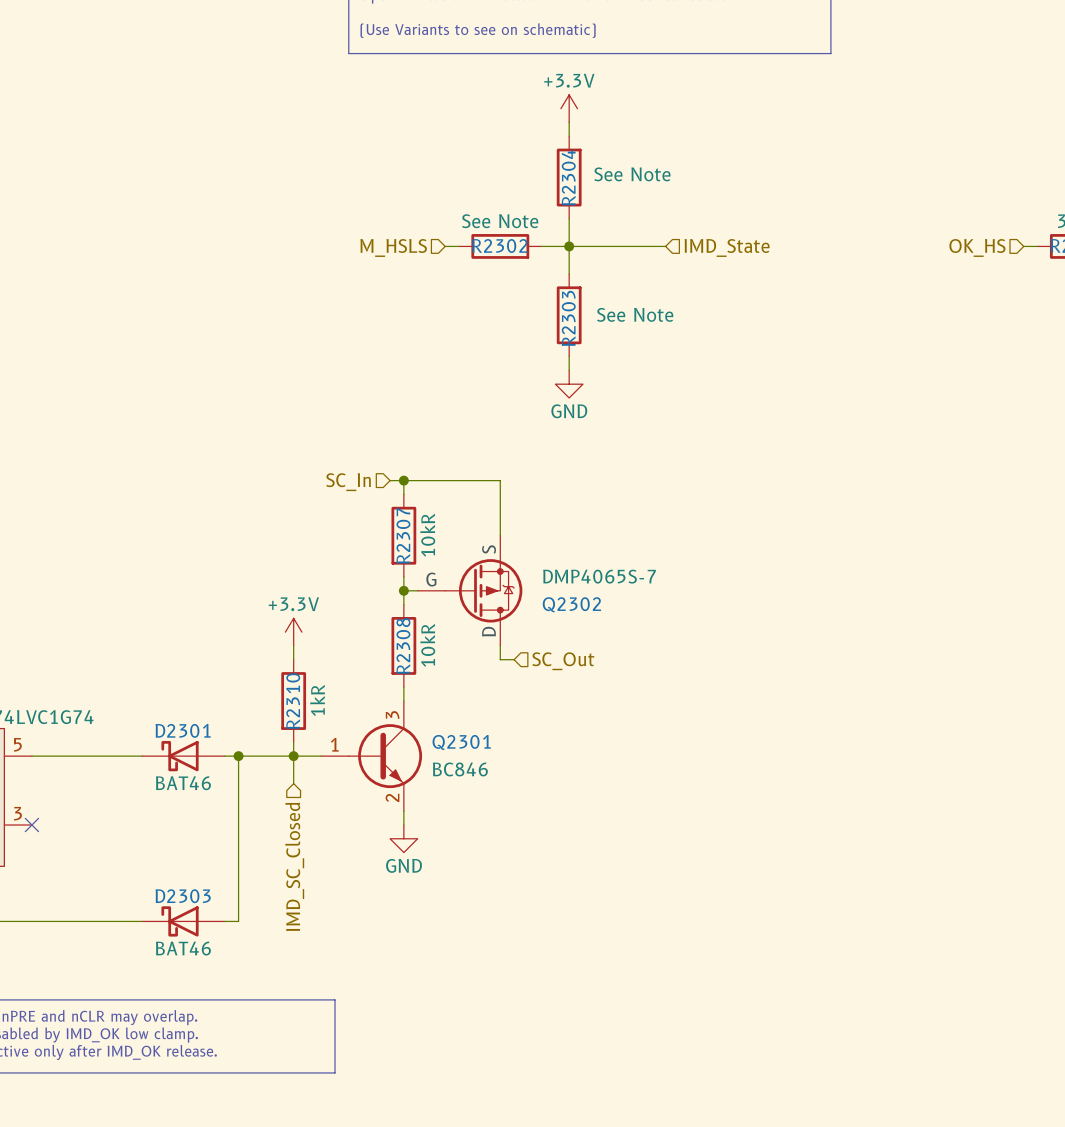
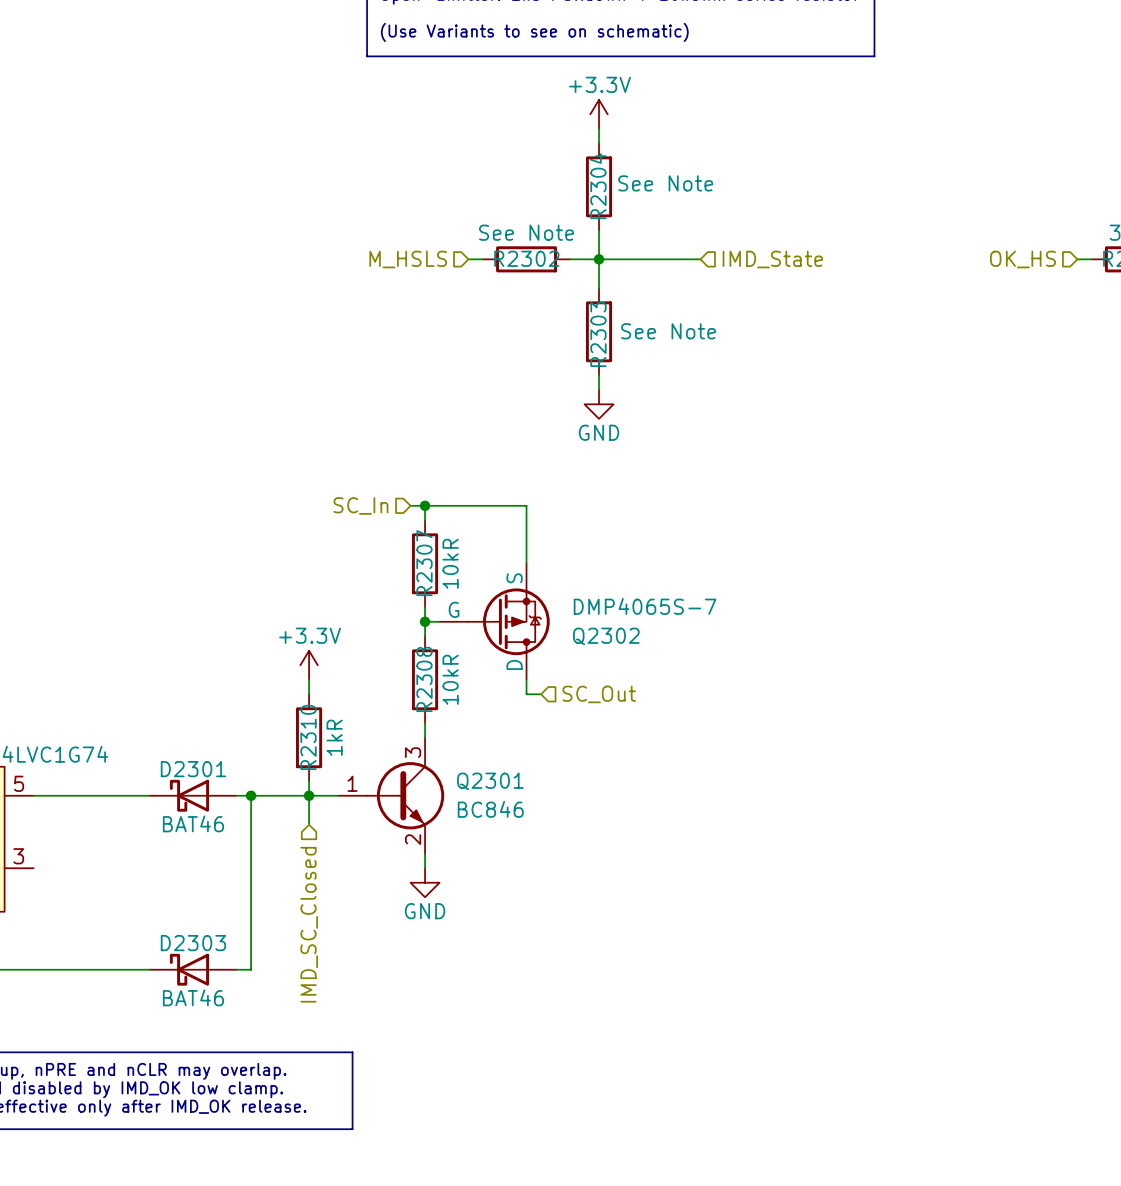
no-connect mark: (31, 825) -> none

